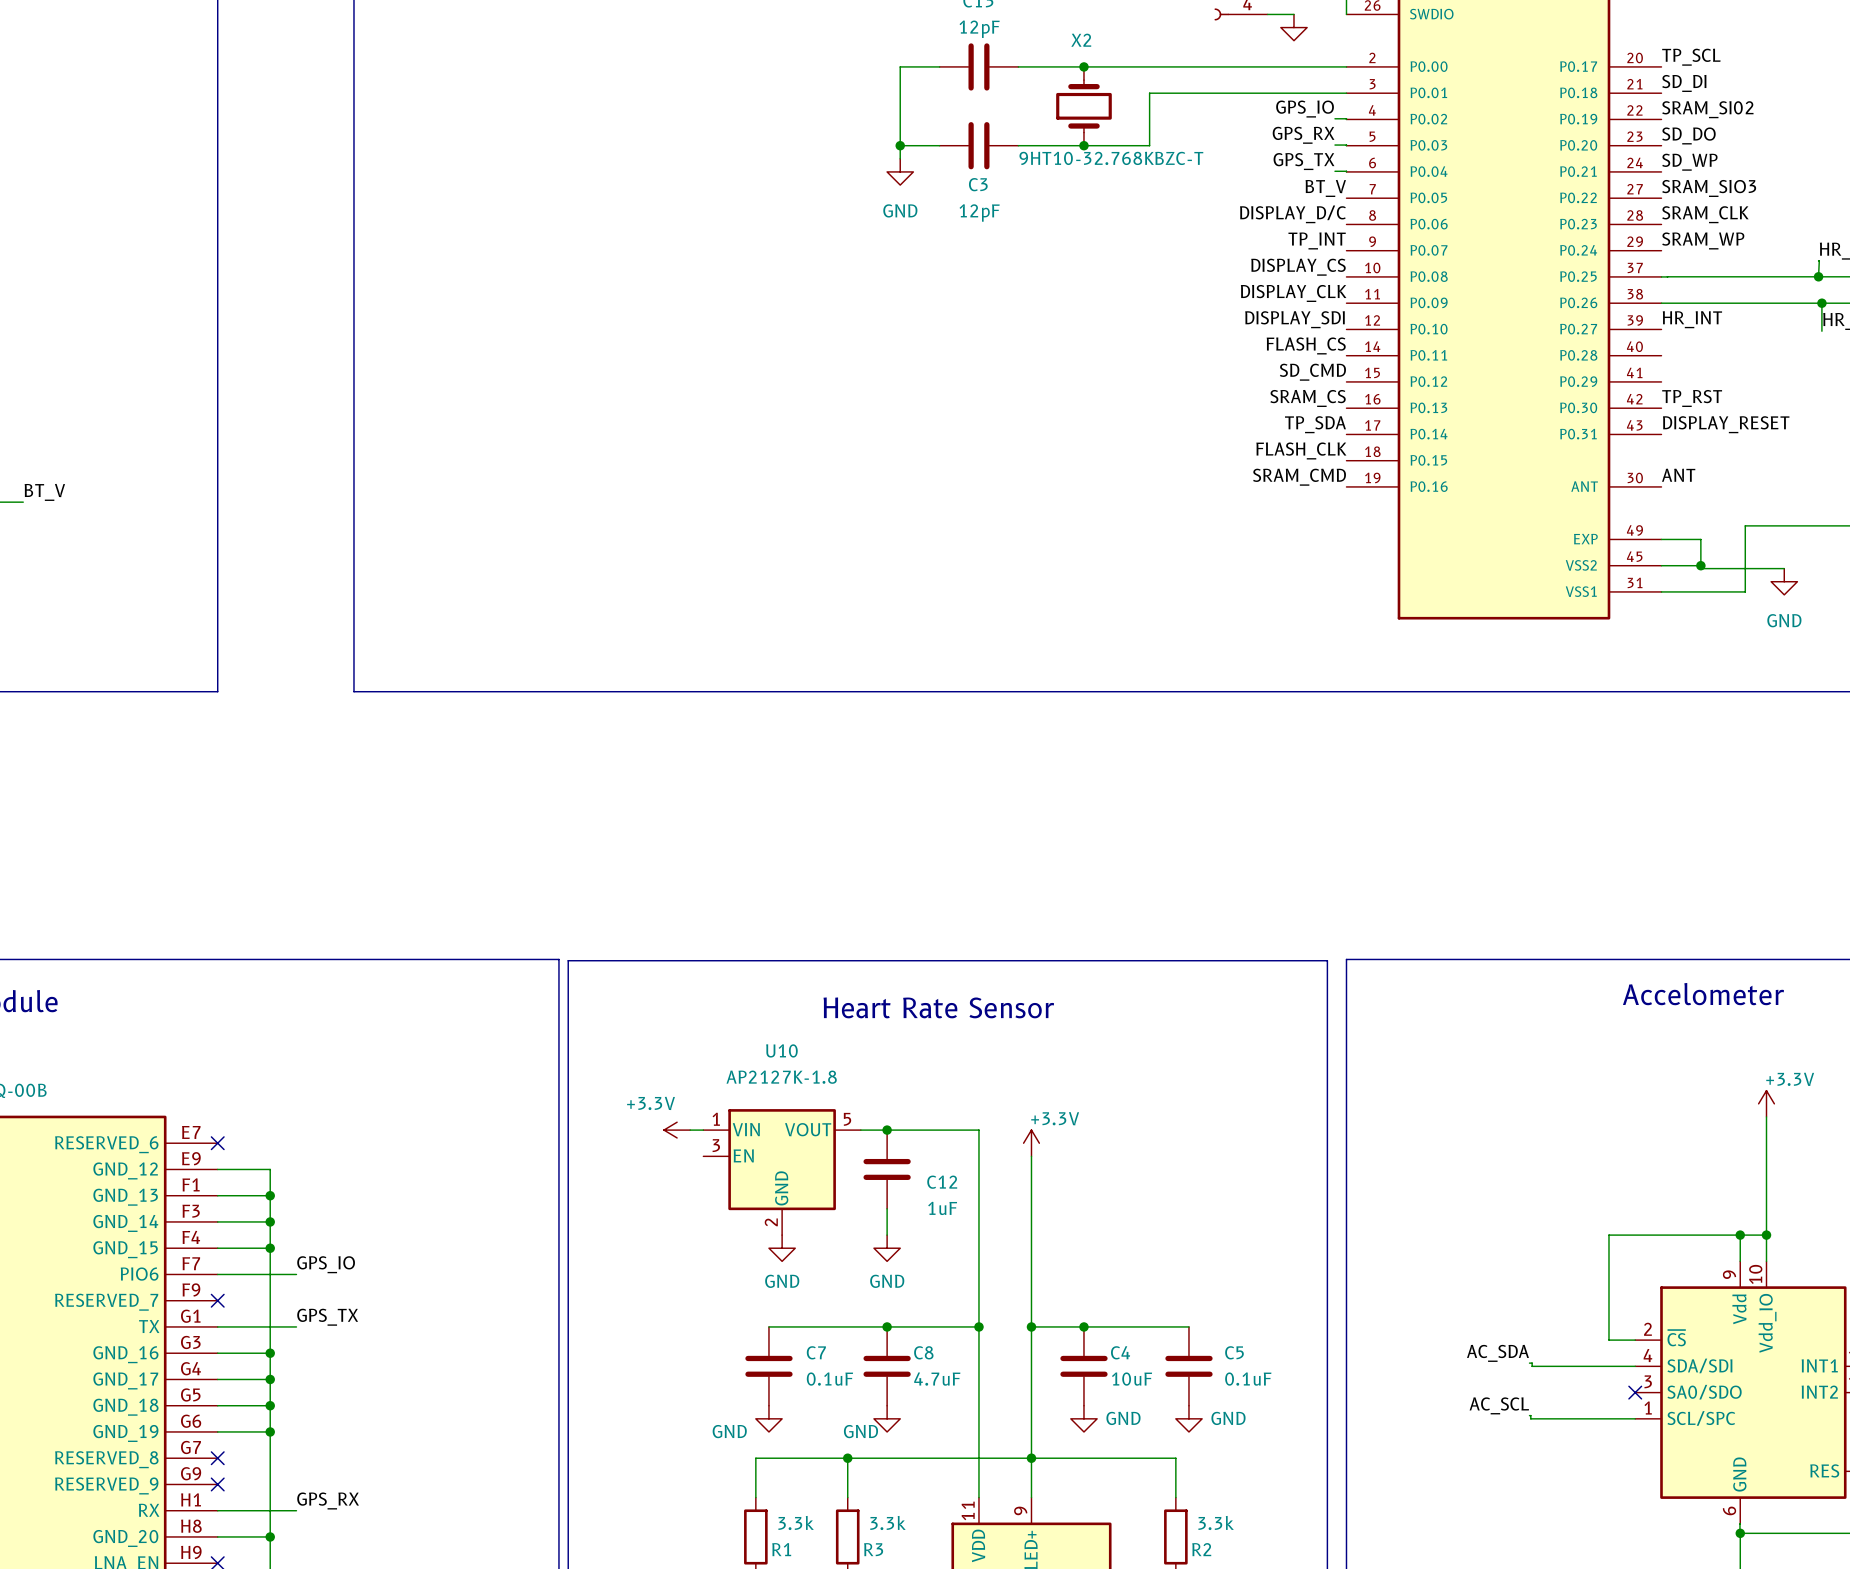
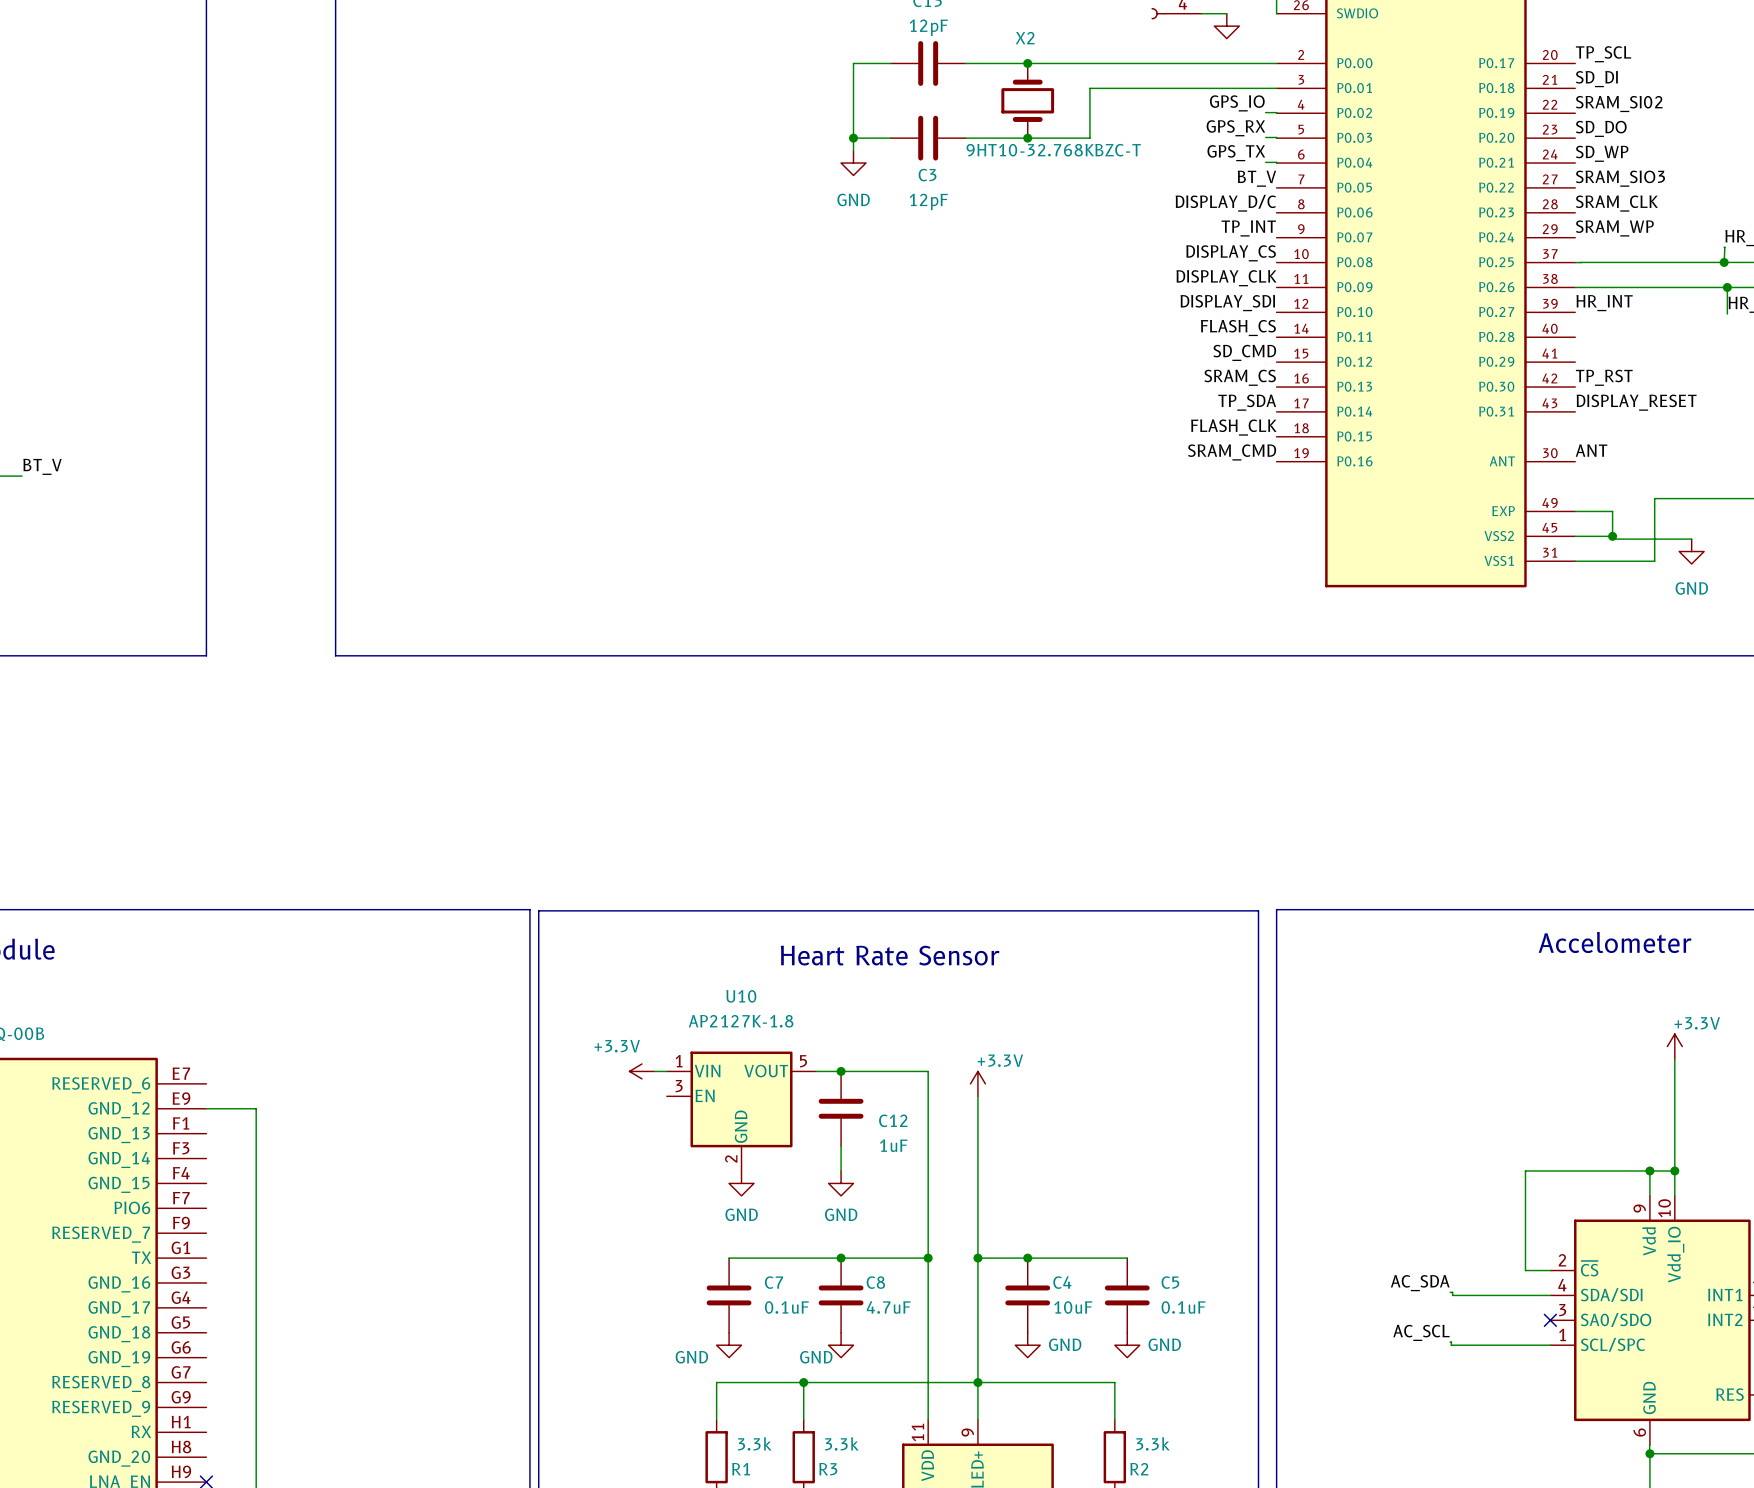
no-connect mark: (217, 1143) -> none
wire: (217, 1195) (270, 1195) -> none
junction: (270, 1195) -> none
wire: (217, 1221) (270, 1221) -> none
junction: (270, 1221) -> none
wire: (217, 1248) (270, 1248) -> none
junction: (270, 1248) -> none
label: GPS_IO (326, 1264) -> none
wire: (217, 1274) (296, 1274) -> none
no-connect mark: (217, 1300) -> none
label: GPS_TX (327, 1317) -> none
wire: (217, 1326) (296, 1326) -> none
wire: (217, 1353) (270, 1353) -> none
junction: (270, 1353) -> none
wire: (217, 1379) (270, 1379) -> none
junction: (270, 1379) -> none
wire: (217, 1405) (270, 1405) -> none
junction: (270, 1405) -> none
wire: (217, 1431) (270, 1431) -> none
junction: (270, 1431) -> none
no-connect mark: (217, 1458) -> none
no-connect mark: (217, 1484) -> none
label: GPS_RX (328, 1500) -> none
wire: (217, 1510) (296, 1510) -> none
wire: (217, 1536) (270, 1536) -> none
junction: (270, 1536) -> none

